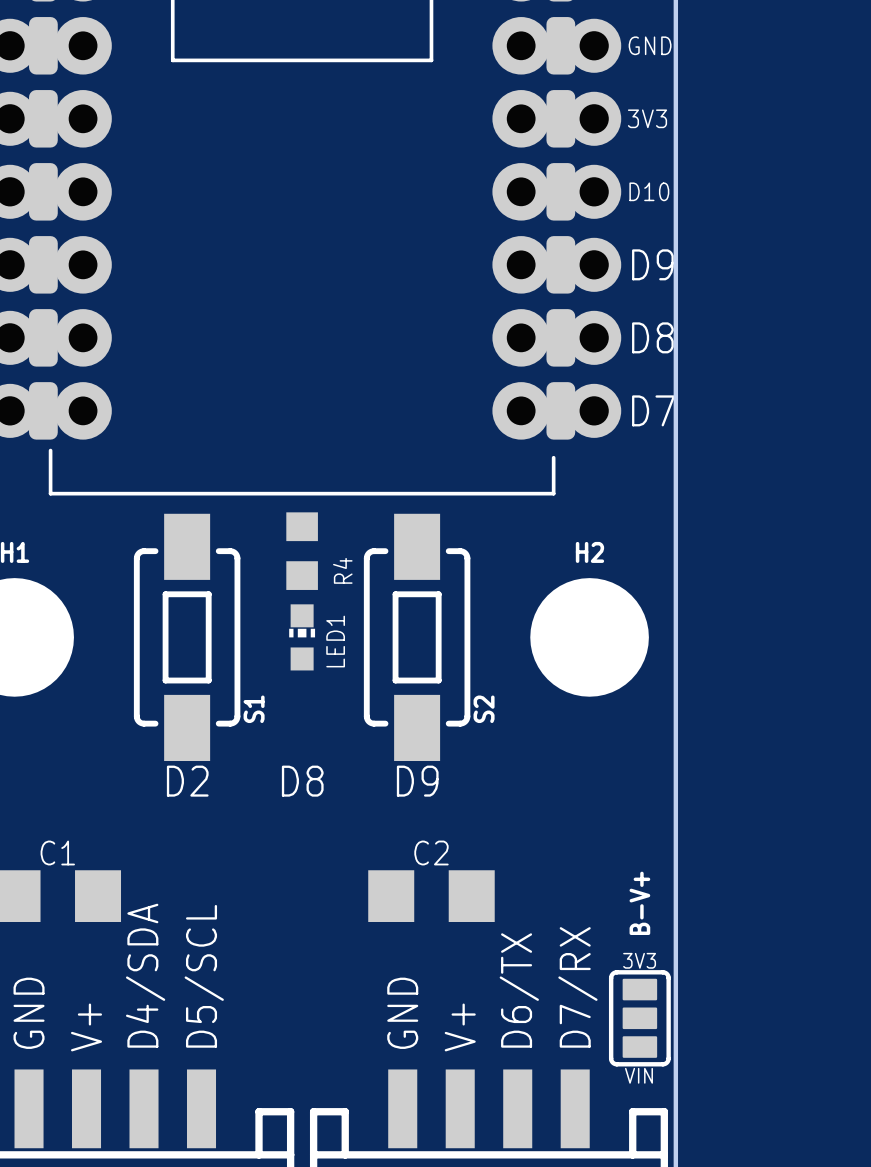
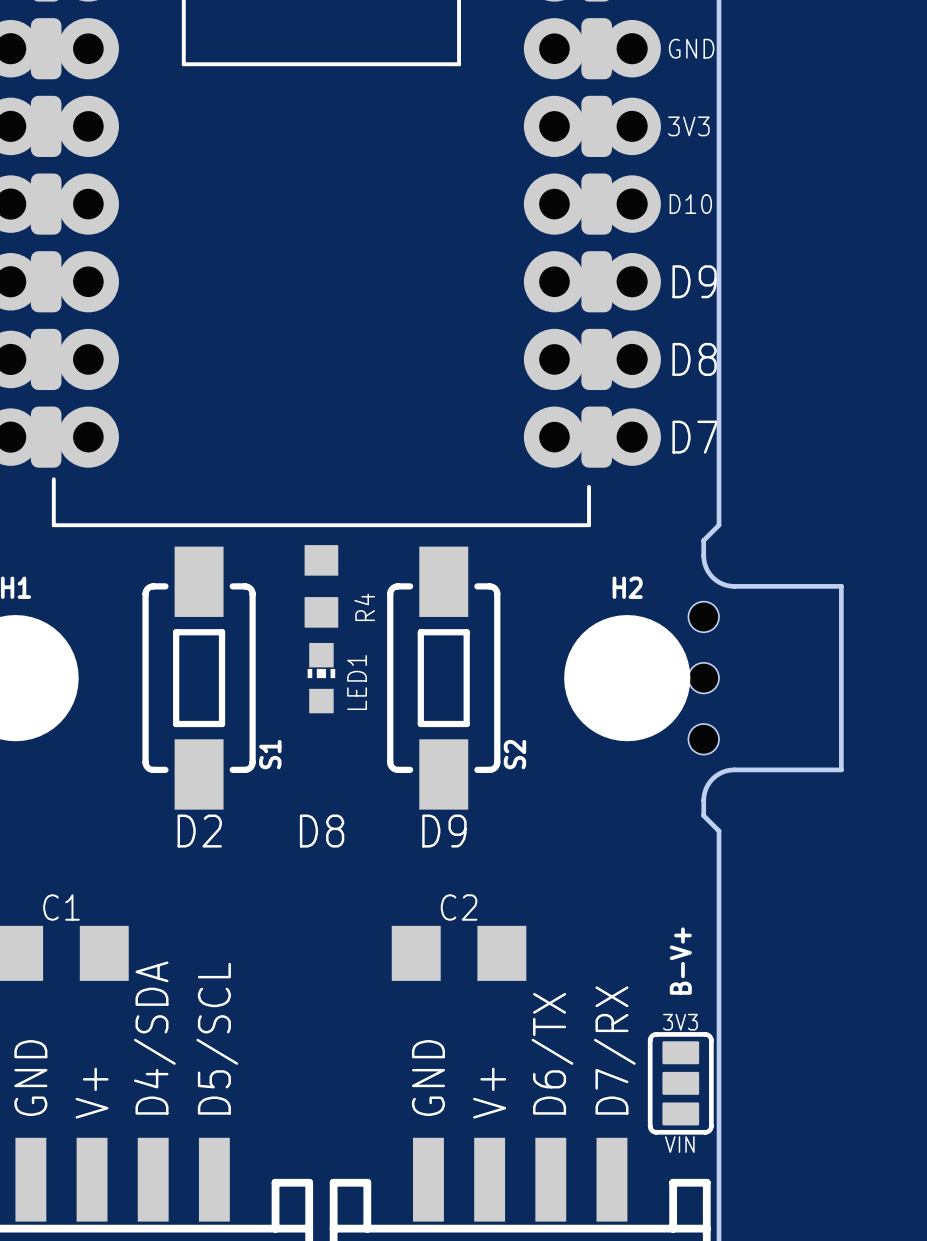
board edge: (675, 493) (675, 781) -> (719, 525) (703, 540) (706, 567) (710, 574) (719, 582) (734, 586) (841, 586) (841, 769) (734, 769) (719, 773) (707, 785) (703, 800) (703, 815) (719, 831)
hole: none -> (703, 616)
hole: none -> (703, 678)
hole: none -> (703, 739)

